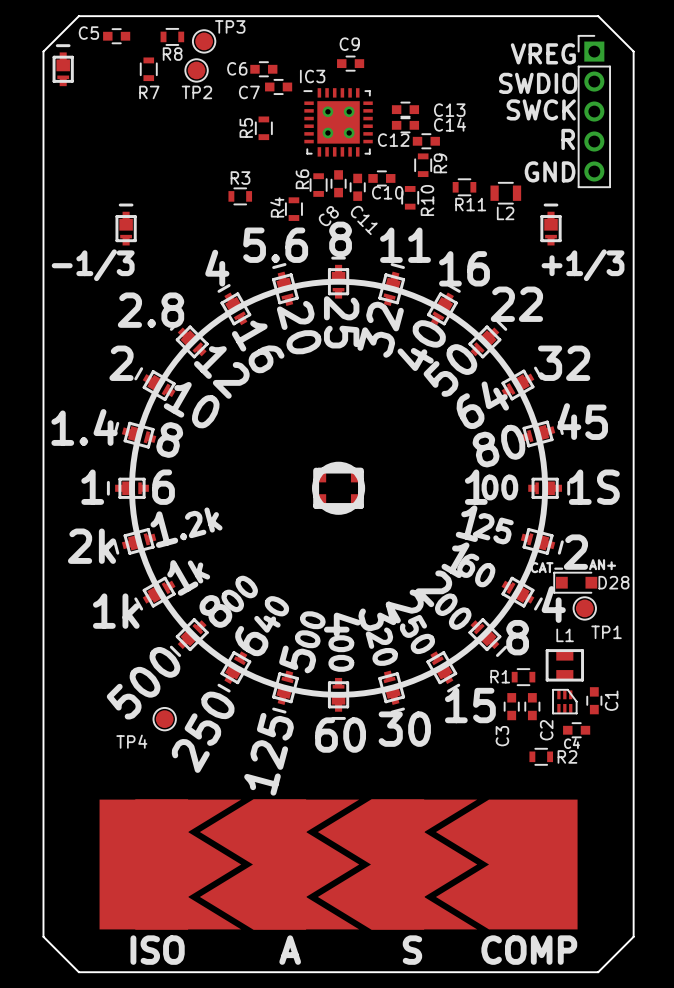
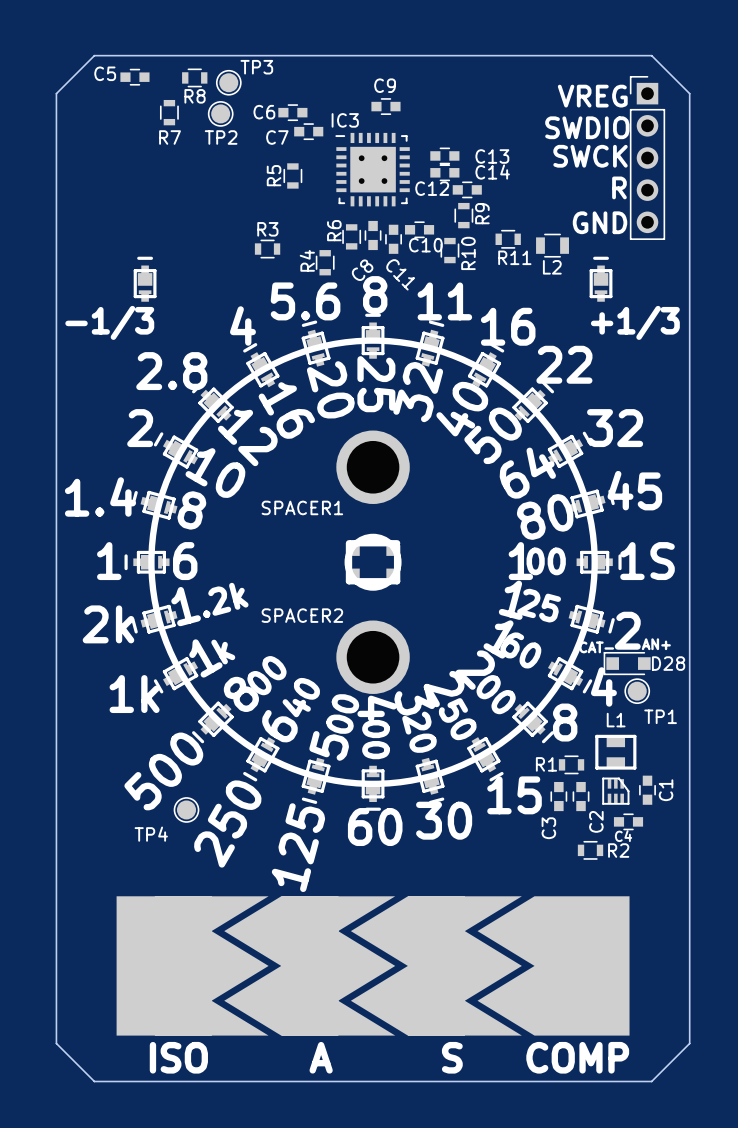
part: (63, 65) -> none
SPACER1: none -> (373, 467)
SPACER2: none -> (373, 657)

